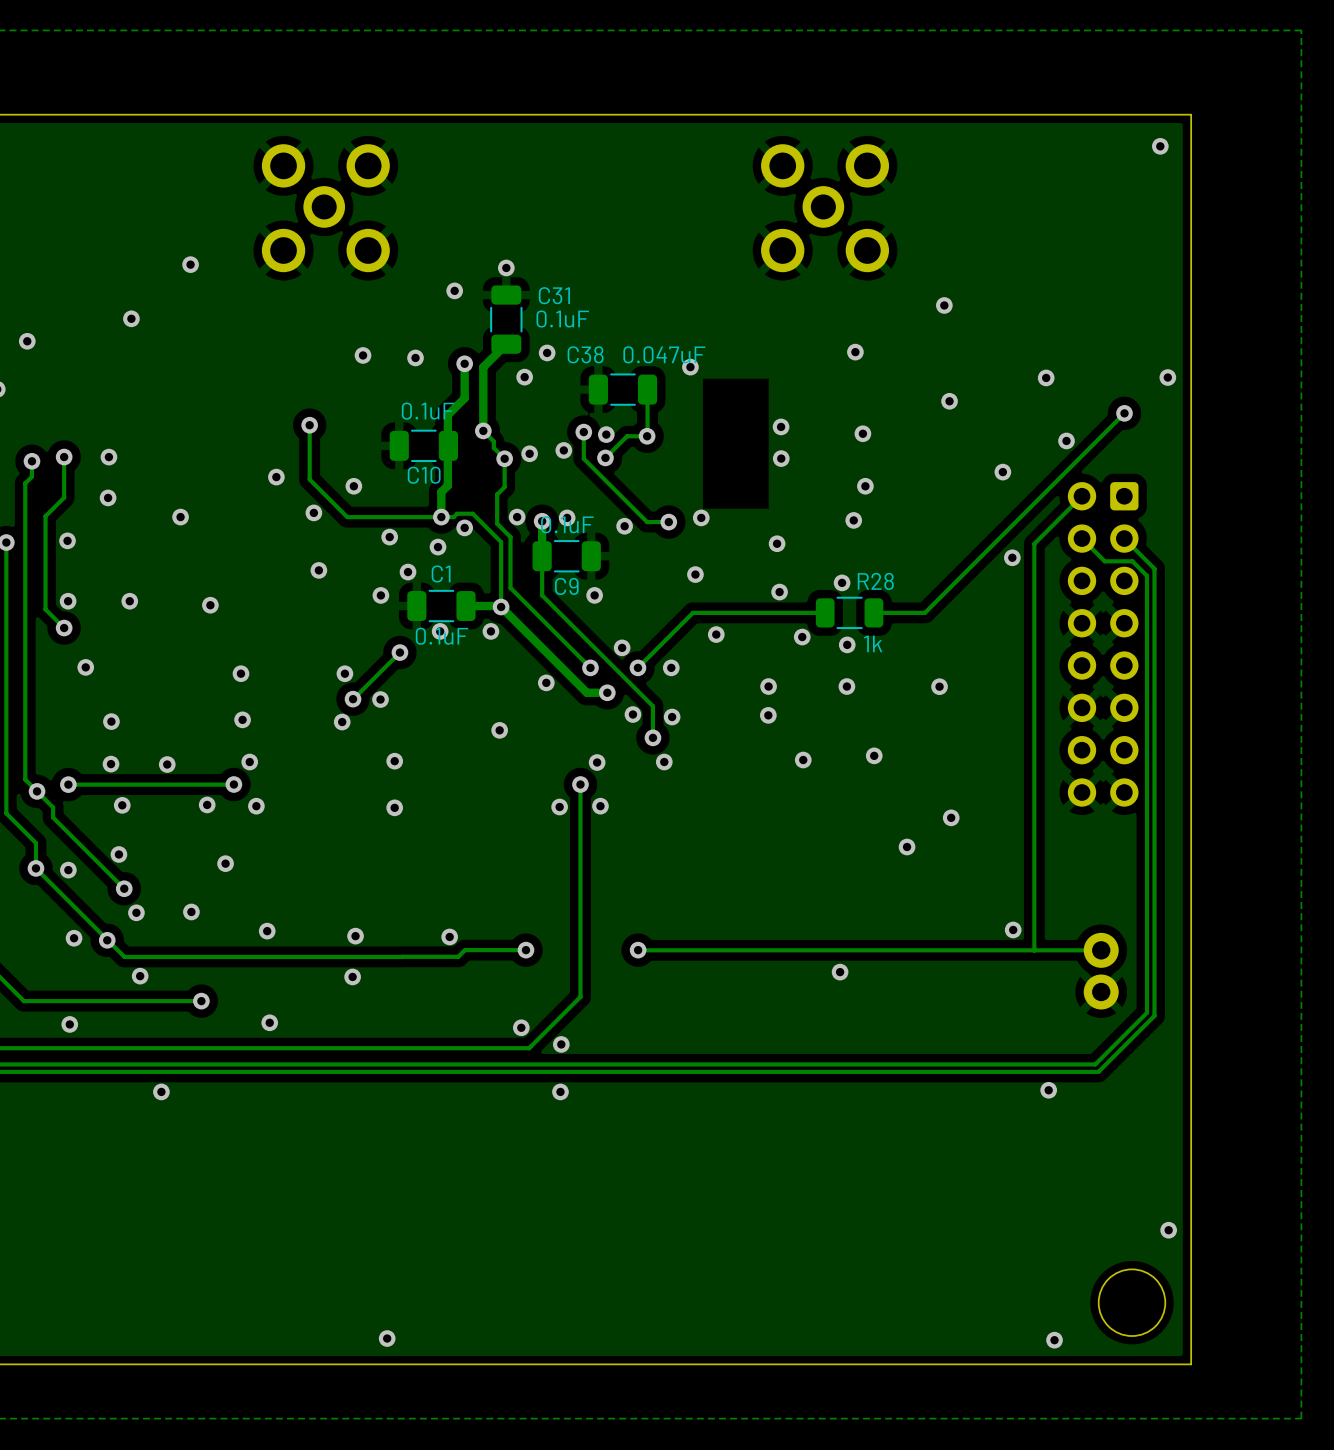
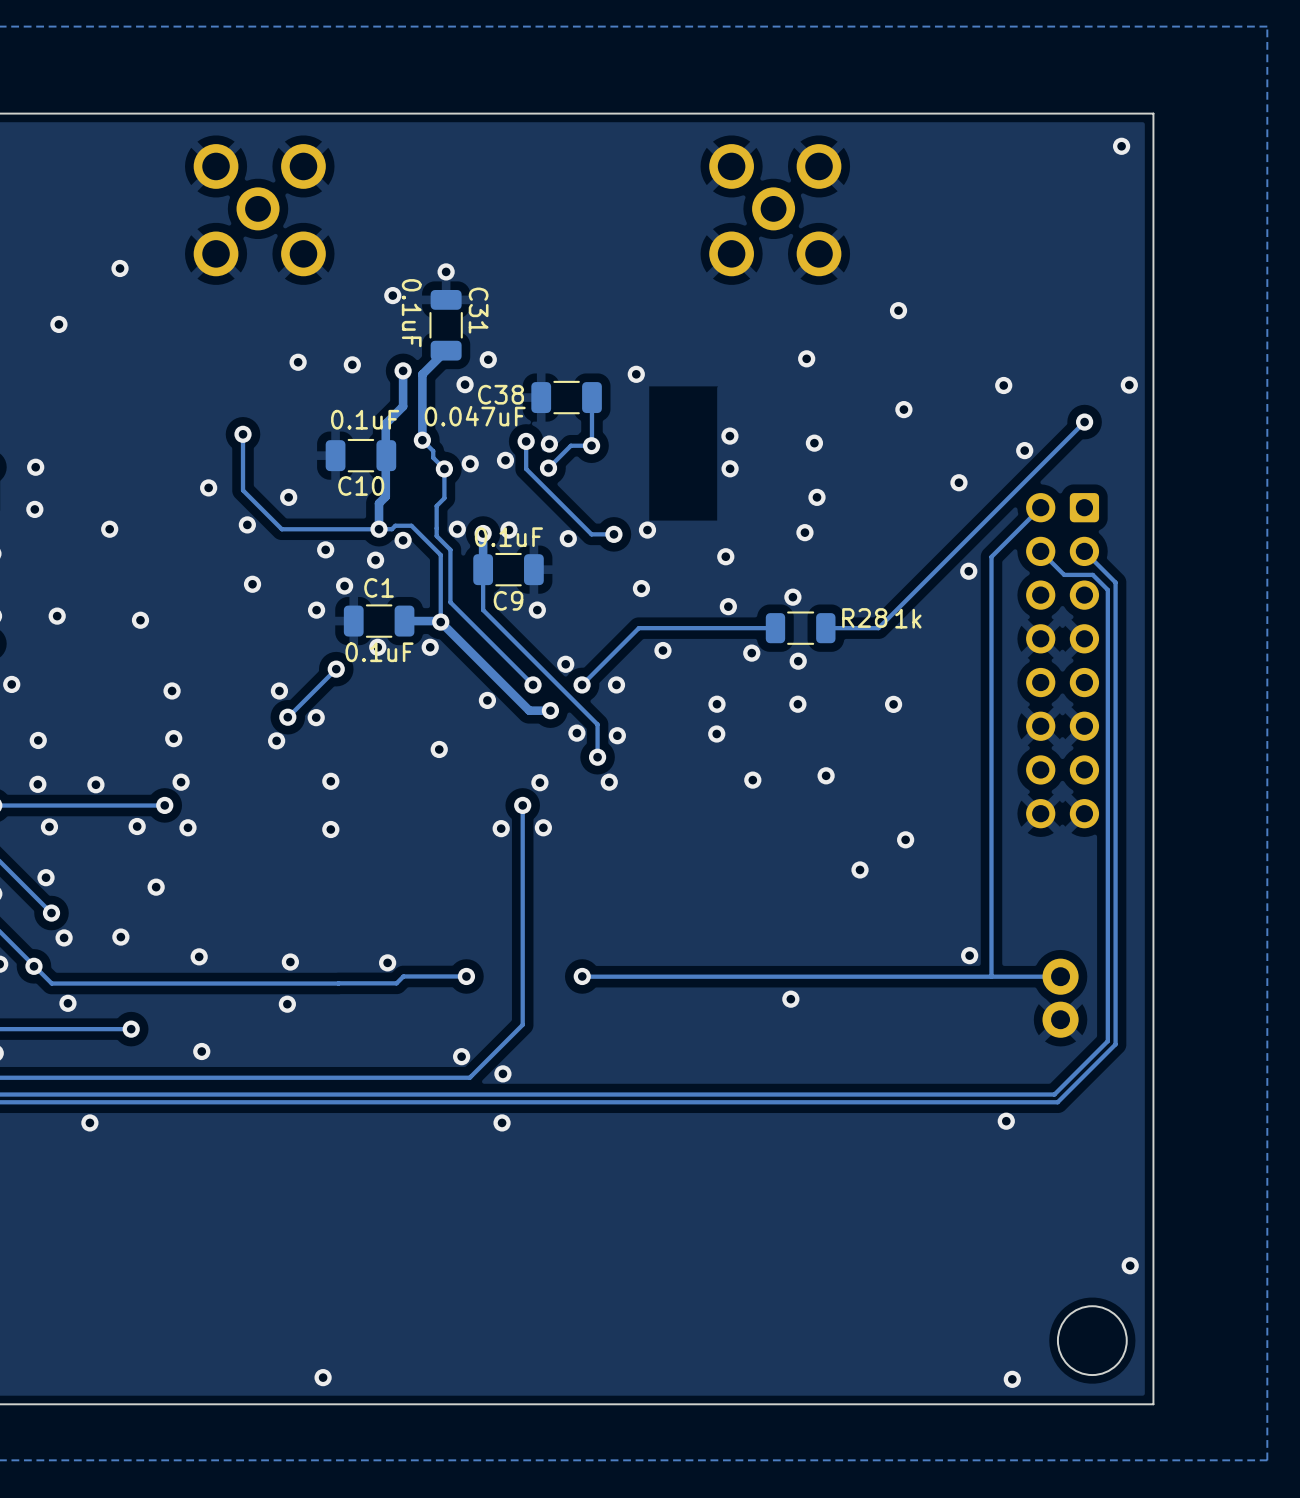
C31 name rotation: 0° (554, 295) -> 90° clockwise (478, 310)
C31 value rotation: 0° (562, 319) -> 90° clockwise (411, 313)
C31 value position: 0.1uF (562, 319) -> 0.1uF (411, 313)
C38 name position: C38 (585, 354) -> C38 (501, 394)
C38 value position: 0.047uF (664, 354) -> 0.047uF (475, 416)
R28 name position: R28 (875, 581) -> R28 (864, 617)
R28 value position: 1k (873, 643) -> 1k (908, 618)

